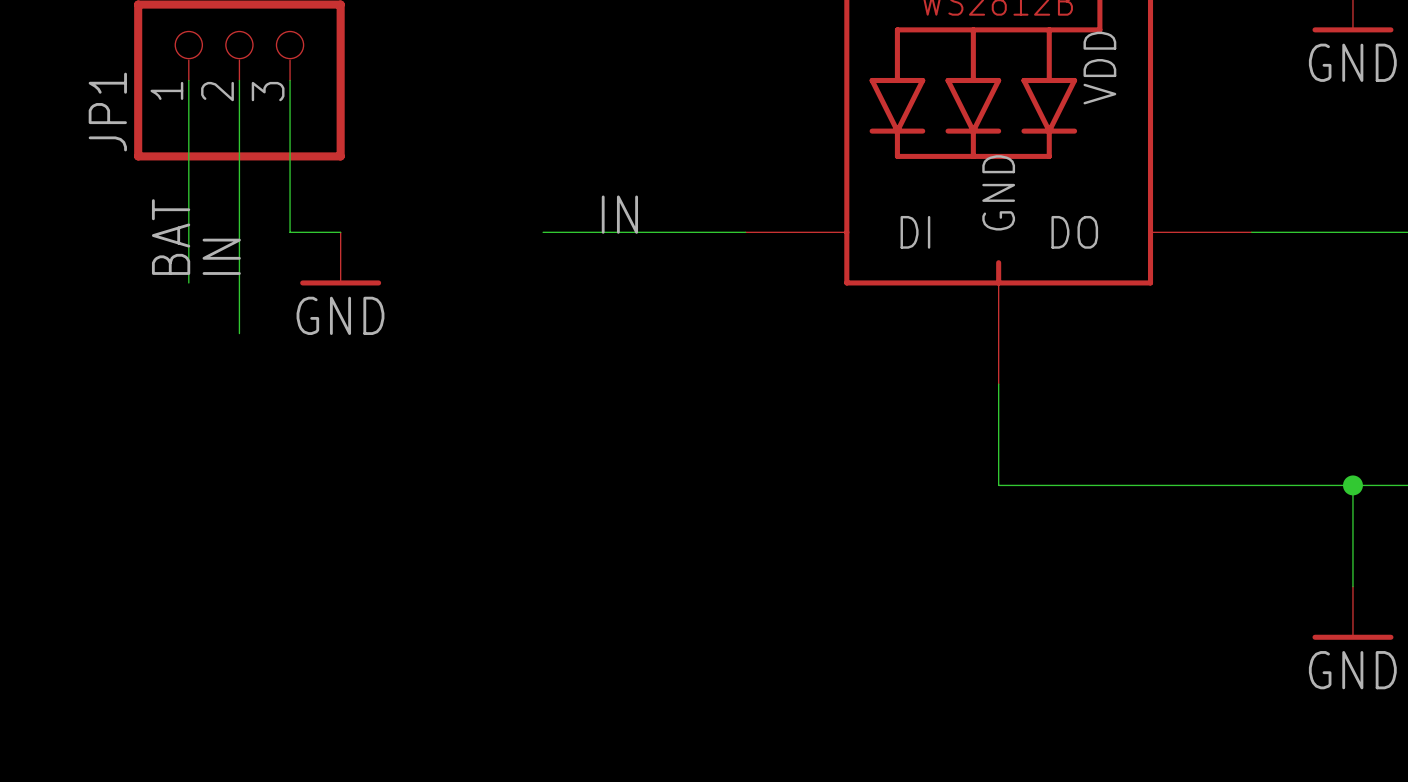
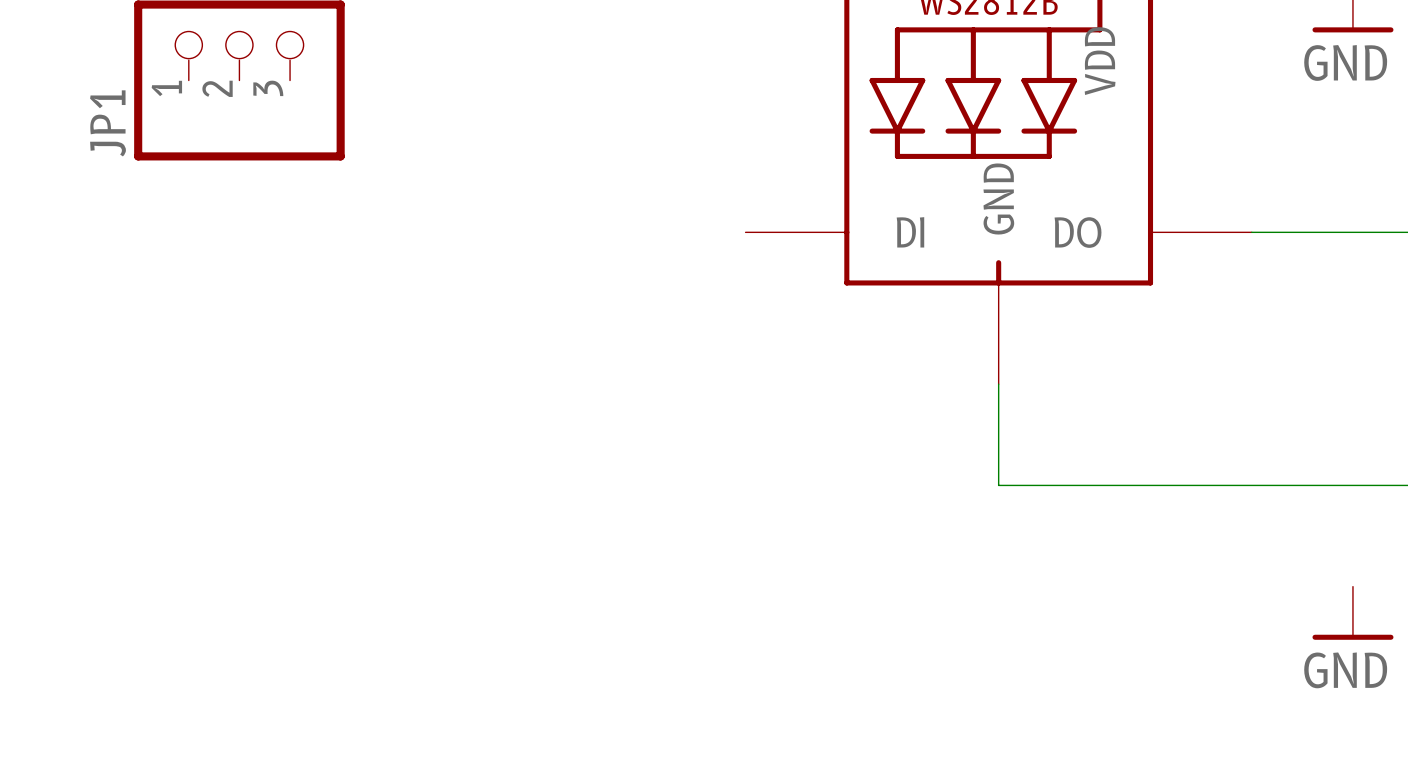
wire: (188, 80) (188, 282) -> none
wire: (239, 80) (239, 333) -> none
wire: (290, 80) (290, 232) (340, 232) -> none
label: IN (619, 214) -> none
wire: (543, 232) (745, 232) -> none
label: BAT (171, 237) -> none
label: IN (221, 256) -> none
power symbol: GND (340, 258) -> none
wire: (1352, 485) (1352, 586) -> none
junction: (1352, 485) -> none

